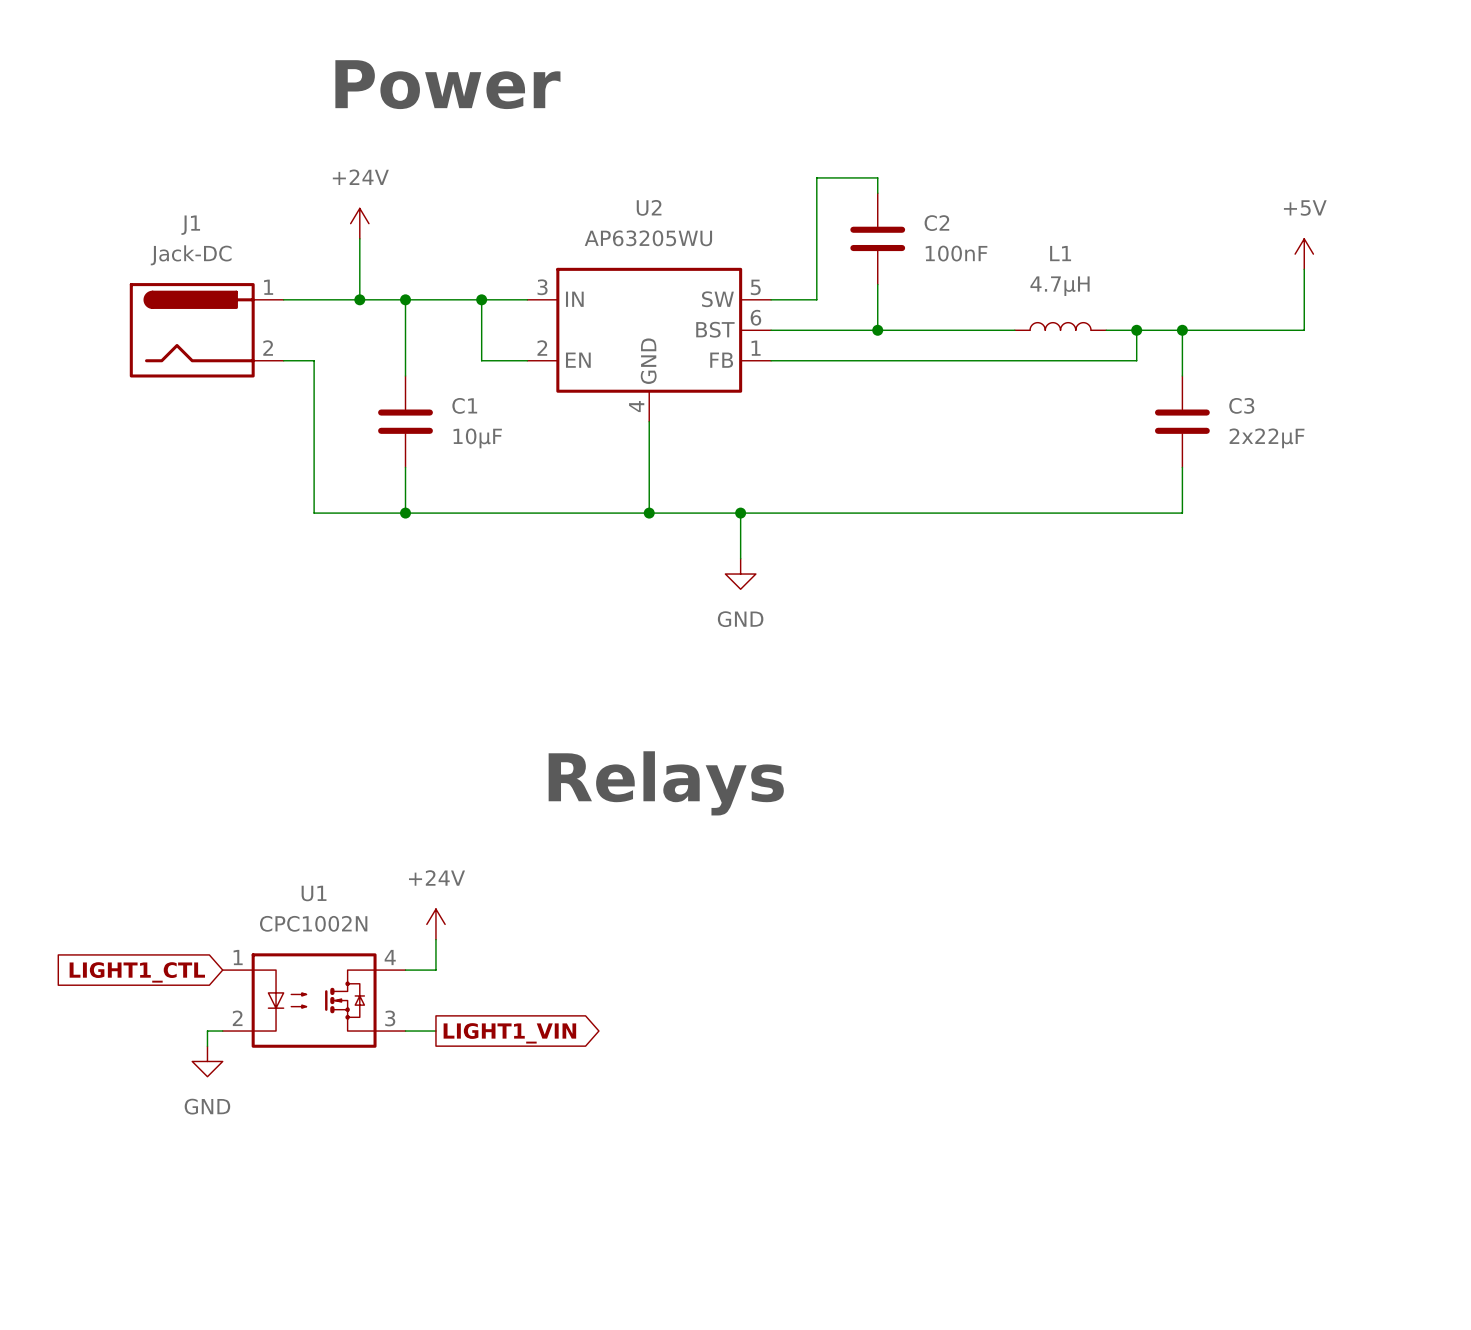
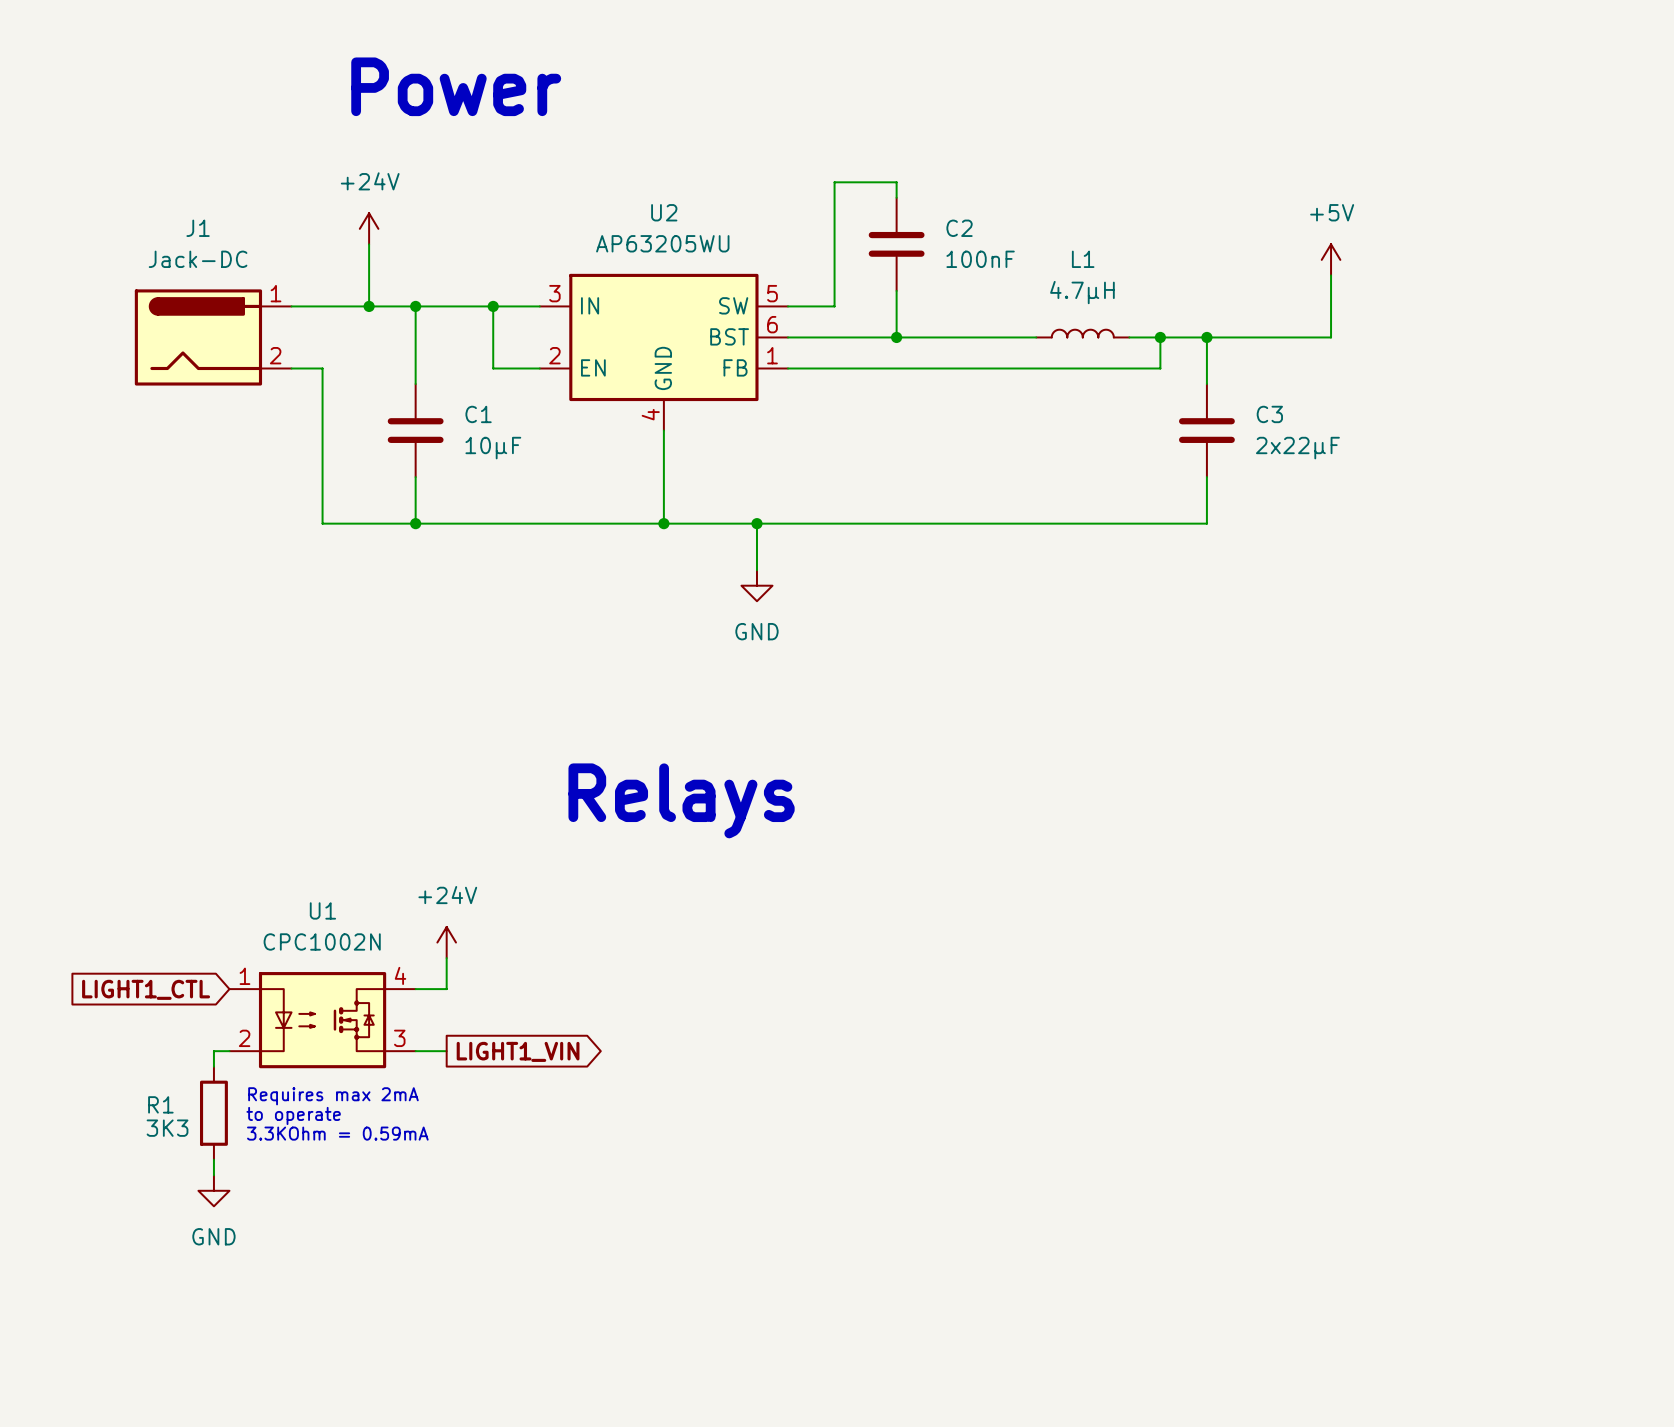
power symbol position: GND (207, 1061) -> GND (213, 1190)
text: none -> Requires max 2mA (333, 1096)
R1: none -> 3K3 (213, 1113)
text: none -> to operate (293, 1115)
text: none -> 3.3KOhm = 0.59mA (337, 1133)
wire: none -> (213, 1159) (213, 1175)

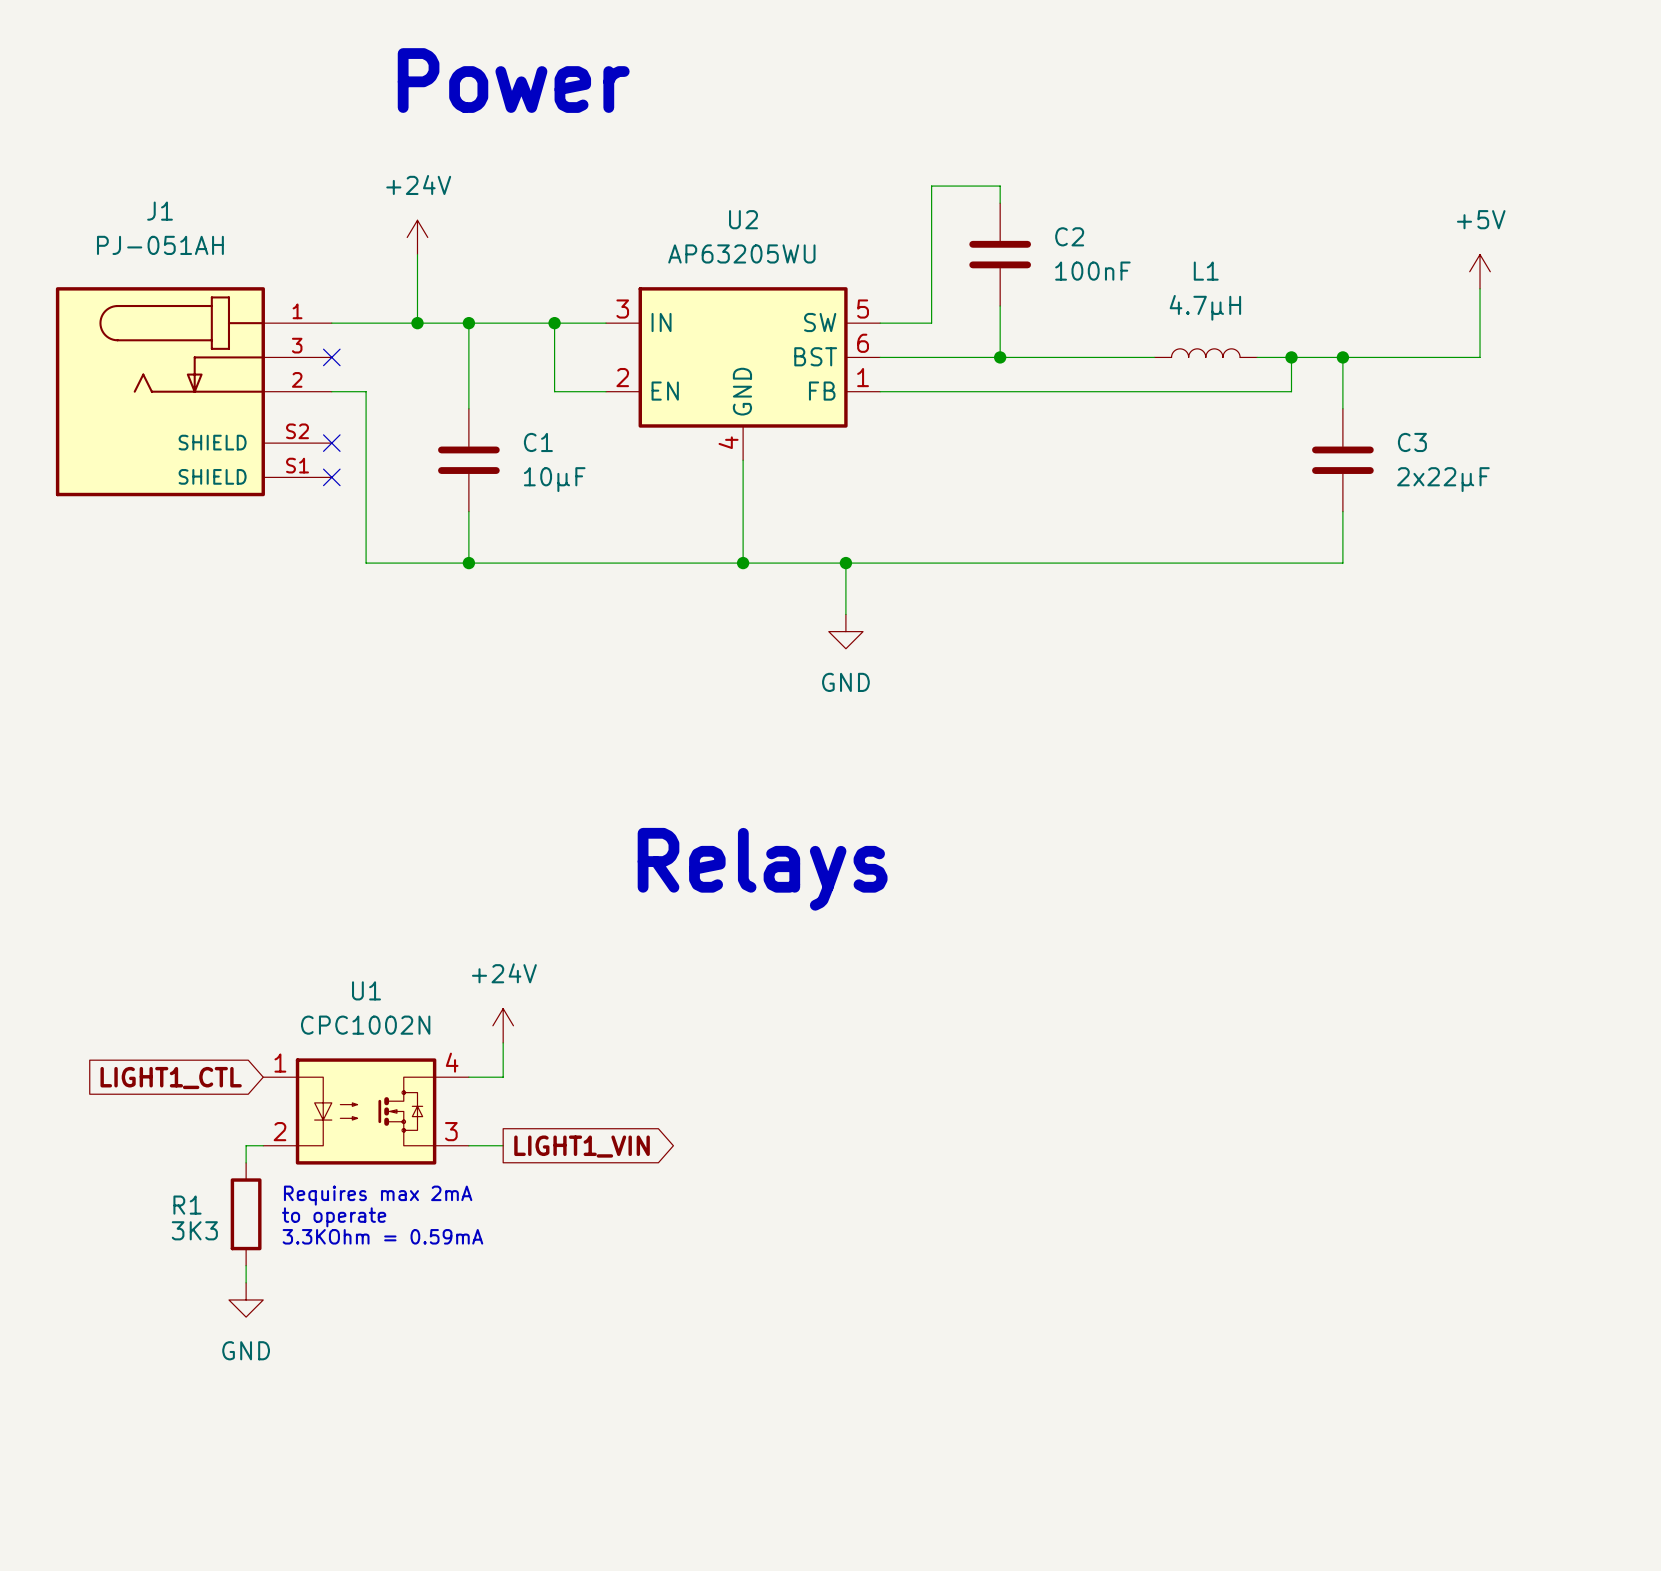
J1 name position: J1 (198, 228) -> J1 (160, 211)
J1 value: Jack-DC (198, 259) -> PJ-051AH (160, 245)
J1 symbol: [134, 289, 292, 386] -> [55, 287, 332, 497]
no-connect mark: none -> (331, 357)
no-connect mark: none -> (331, 443)
no-connect mark: none -> (331, 477)

